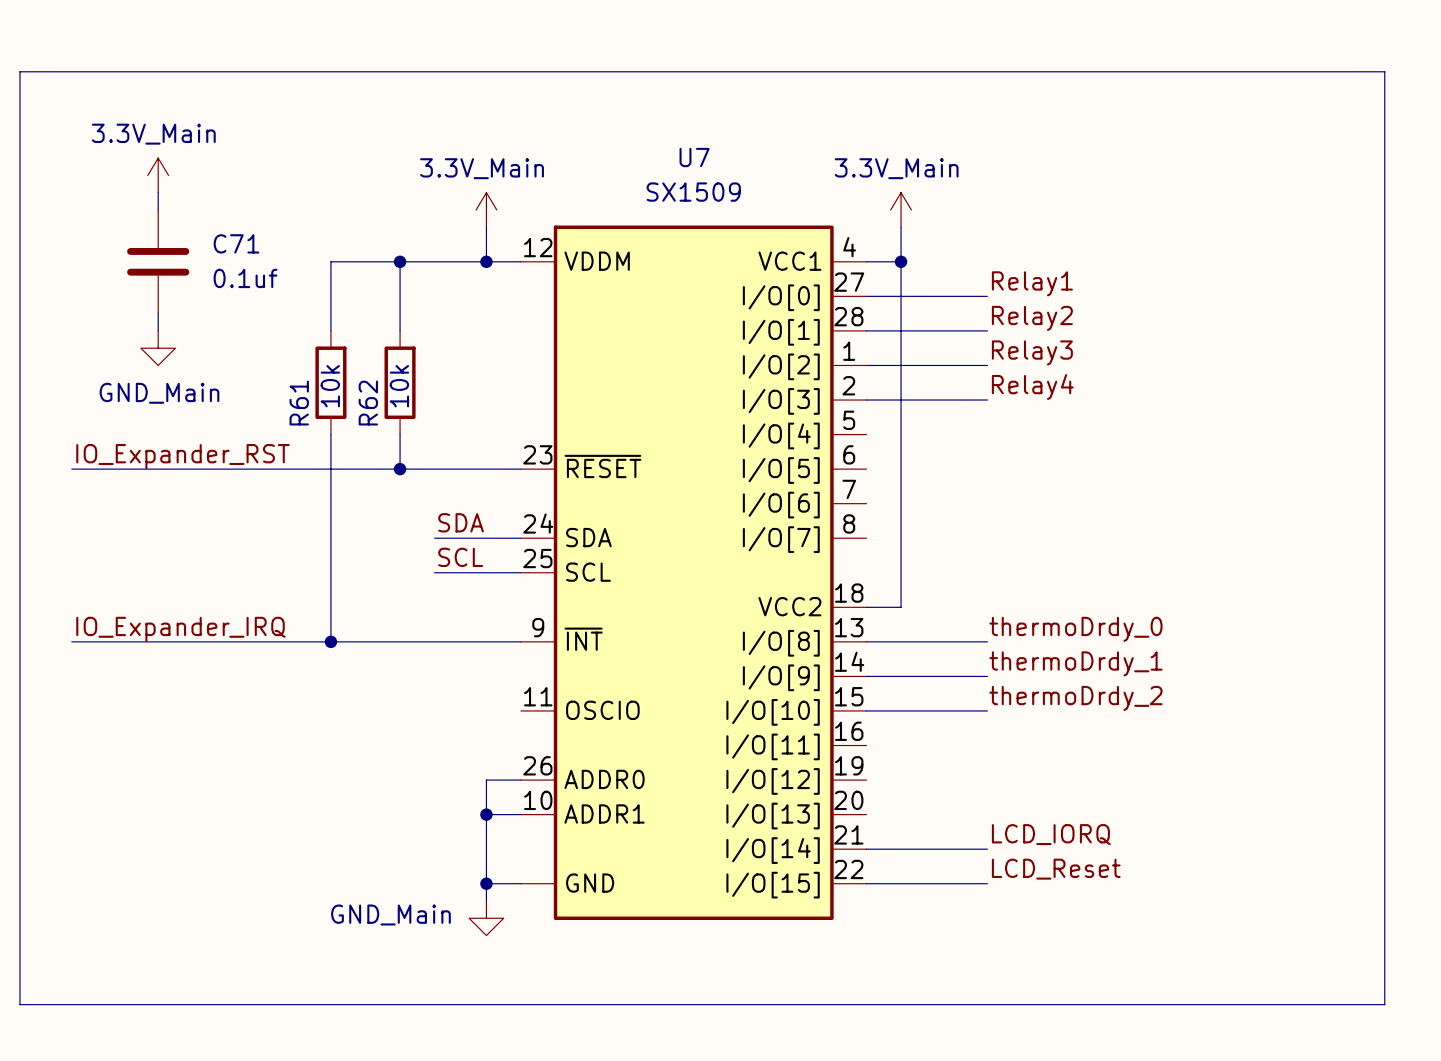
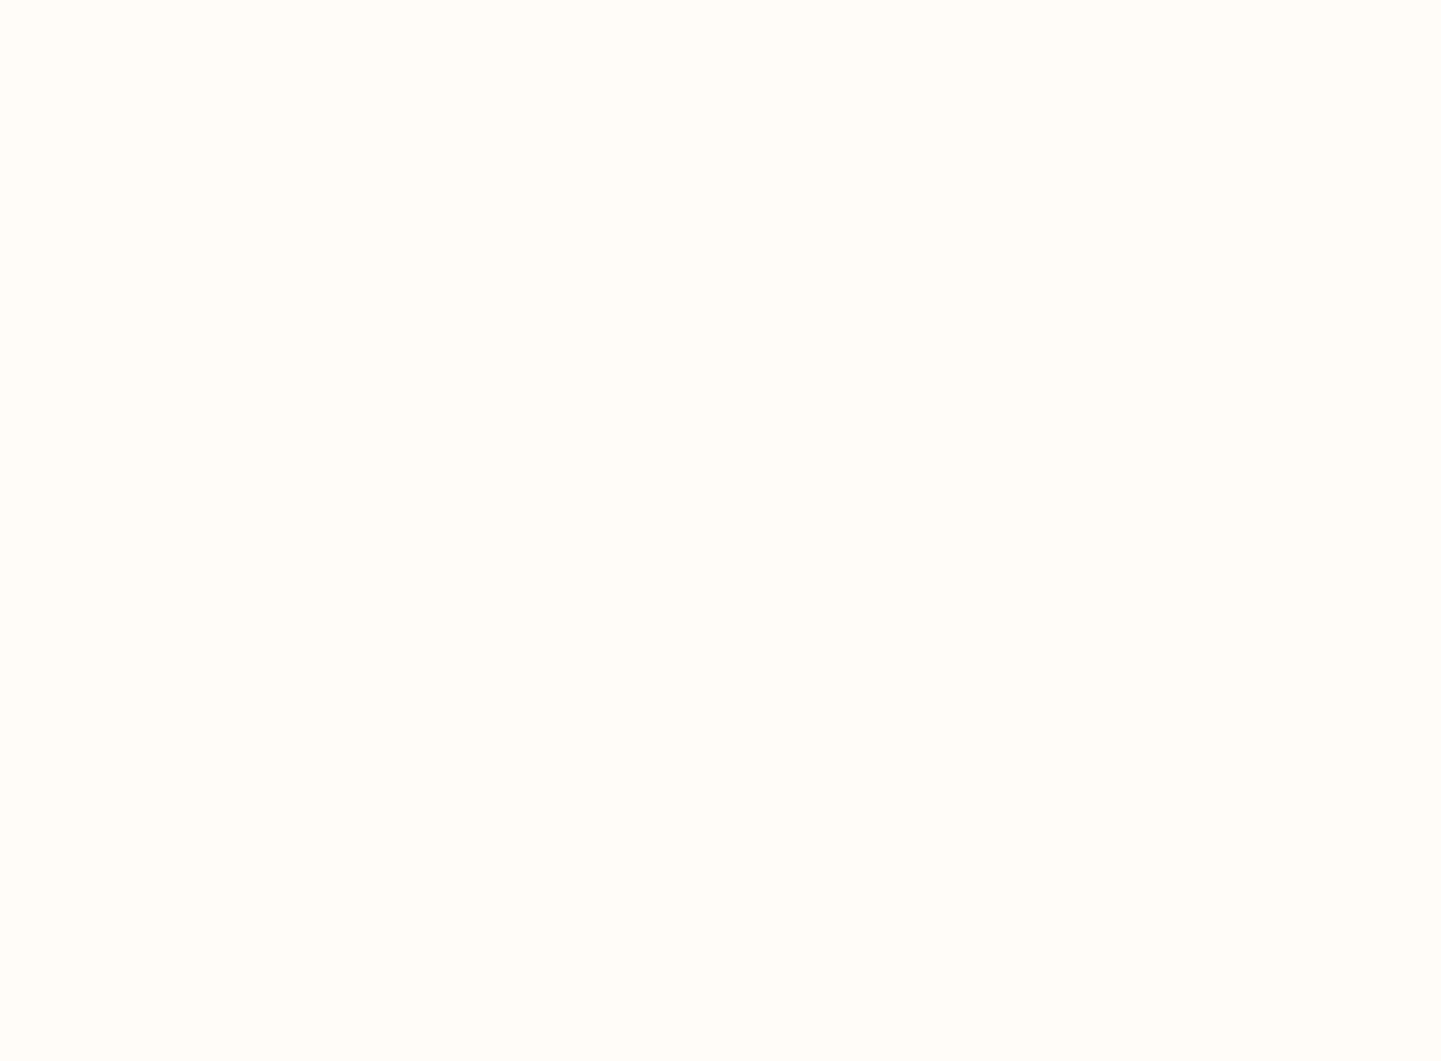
line: (19, 71) (1384, 71) (1384, 1004) (19, 1004) (19, 71) -> none
power symbol: 3.3V_Main (158, 175) -> none
wire: (158, 192) (158, 209) -> none
power symbol: 3.3V_Main (486, 209) -> none
power symbol: 3.3V_Main (901, 209) -> none
wire: (486, 227) (486, 261) -> none
wire: (901, 227) (901, 607) (866, 607) -> none
C71: 0.1uf (158, 261) -> none
wire: (400, 261) (400, 330) -> none
junction: (400, 261) -> none
junction: (486, 261) -> none
wire: (520, 261) (330, 261) (330, 330) -> none
wire: (866, 261) (901, 261) -> none
junction: (901, 261) -> none
label: Relay1 (1032, 283) -> none
wire: (866, 296) (987, 296) -> none
wire: (158, 313) (158, 330) -> none
label: Relay2 (1032, 318) -> none
wire: (866, 330) (987, 330) -> none
power symbol: GND_Main (158, 348) -> none
label: Relay3 (1032, 352) -> none
wire: (866, 365) (987, 365) -> none
R61: 10k (330, 382) -> none
R62: 10k (400, 382) -> none
label: Relay4 (1032, 387) -> none
wire: (866, 400) (987, 400) -> none
wire: (330, 434) (330, 641) -> none
wire: (400, 434) (400, 469) -> none
label: IO_Expander_RST (183, 456) -> none
wire: (71, 469) (520, 469) -> none
junction: (400, 469) -> none
label: SDA (461, 522) -> none
wire: (434, 538) (520, 538) -> none
label: SCL (460, 557) -> none
wire: (434, 572) (520, 572) -> none
U7: SX1509 (693, 572) -> none
label: IO_Expander_IRQ (180, 629) -> none
label: thermoDrdy_0 (1075, 629) -> none
wire: (71, 641) (520, 641) -> none
junction: (330, 641) -> none
wire: (866, 641) (987, 641) -> none
label: thermoDrdy_1 (1075, 663) -> none
wire: (866, 676) (987, 676) -> none
label: thermoDrdy_2 (1075, 698) -> none
wire: (866, 710) (987, 710) -> none
wire: (520, 780) (486, 780) (486, 901) -> none
wire: (486, 814) (520, 814) -> none
junction: (486, 814) -> none
label: LCD_IORQ (1051, 834) -> none
wire: (866, 849) (987, 849) -> none
label: LCD_Reset (1056, 869) -> none
wire: (486, 883) (520, 883) -> none
junction: (486, 883) -> none
wire: (866, 883) (987, 883) -> none
power symbol: GND_Main (486, 918) -> none

